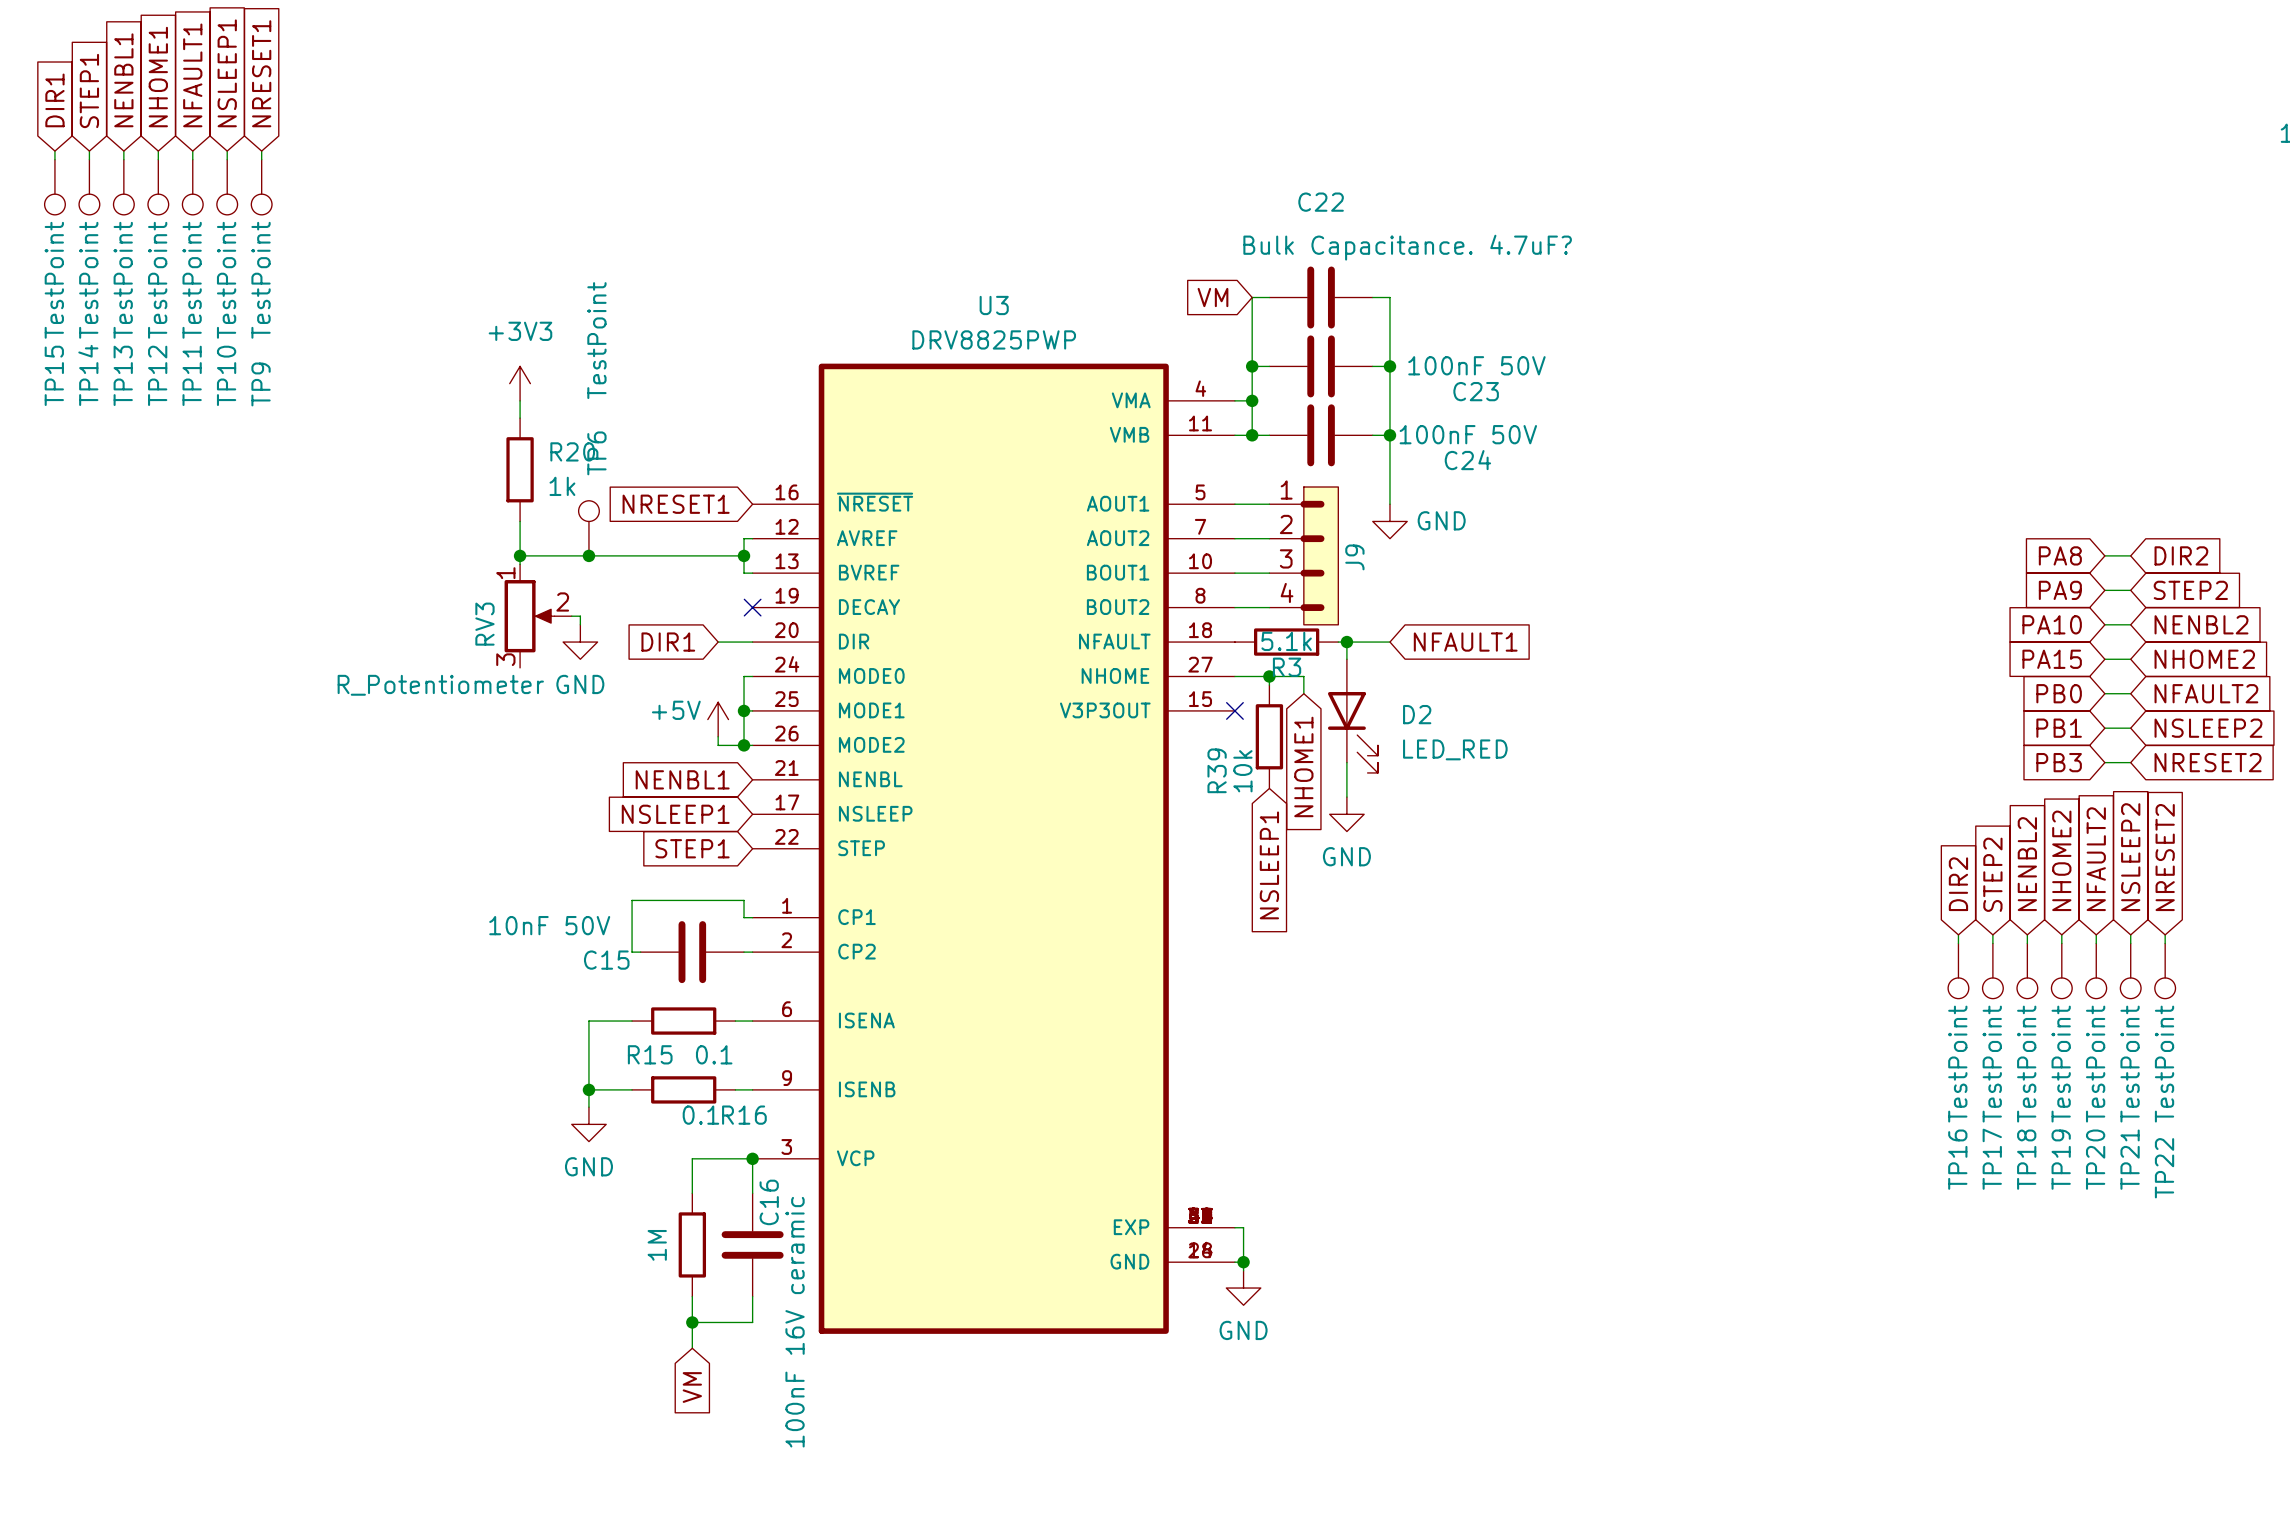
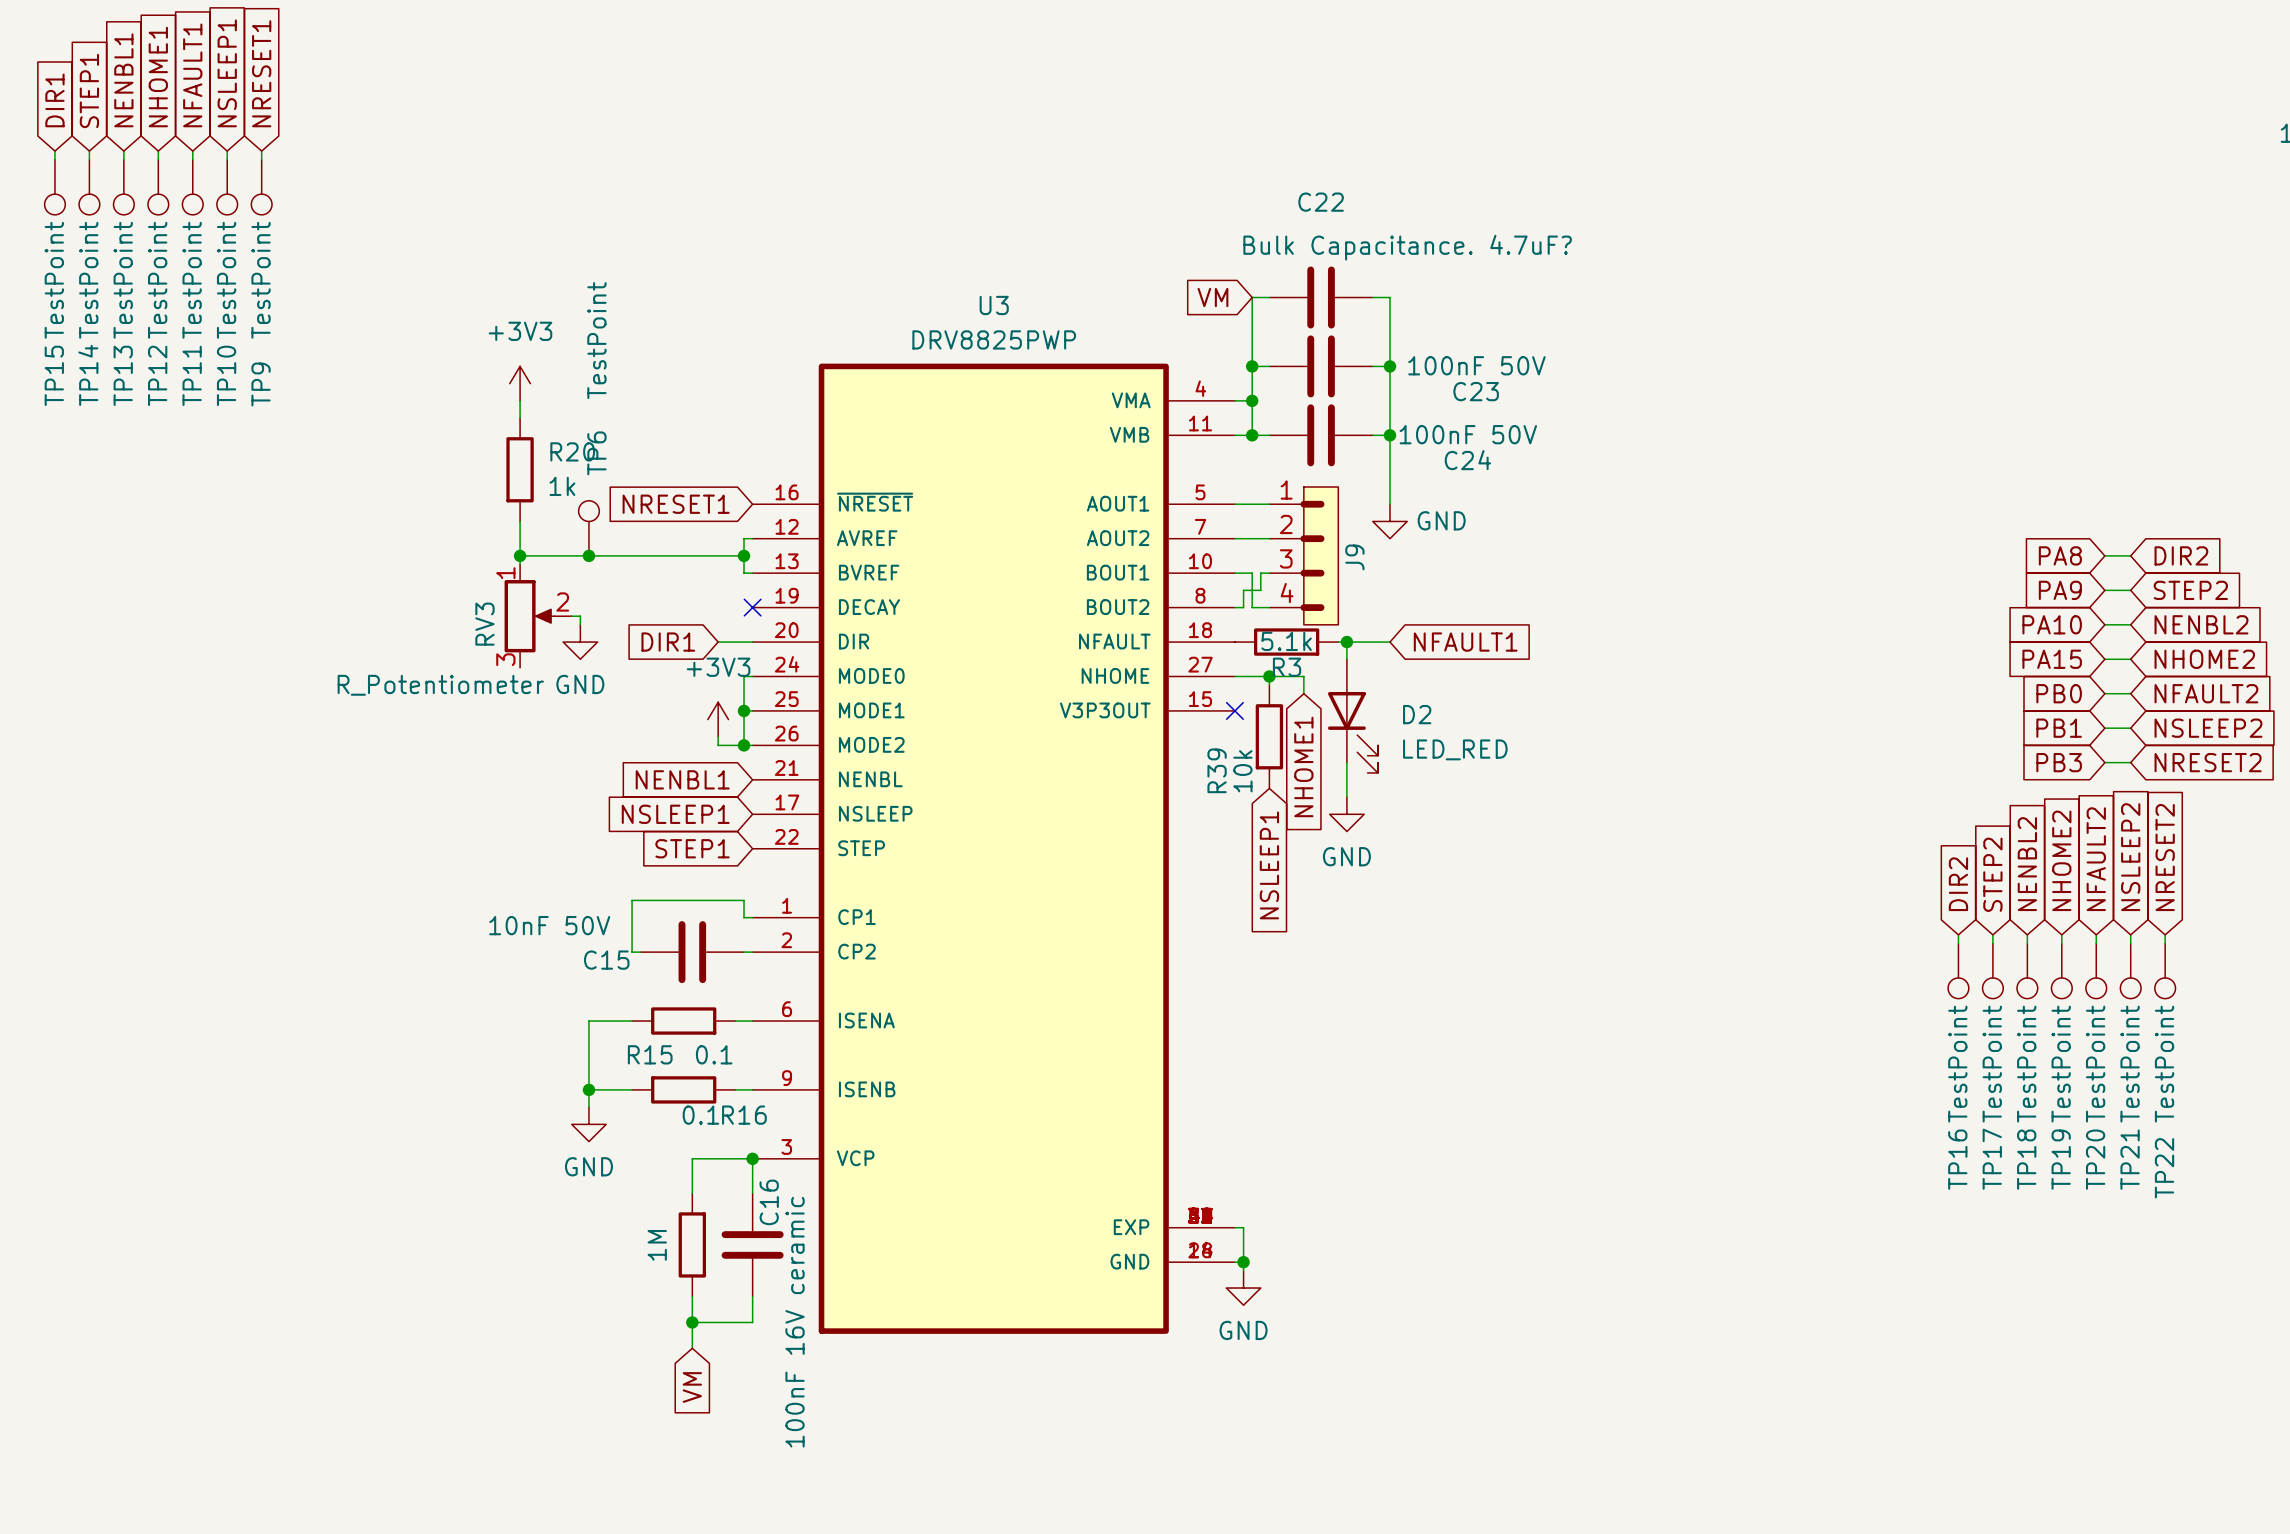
wire: (1252, 573) (1260, 573) -> (1252, 573) (1252, 607)
wire: (1243, 607) (1252, 607) -> (1243, 607) (1243, 590) (1260, 590) (1260, 573)
power symbol: +5V (718, 719) -> +3V3 (718, 719)

